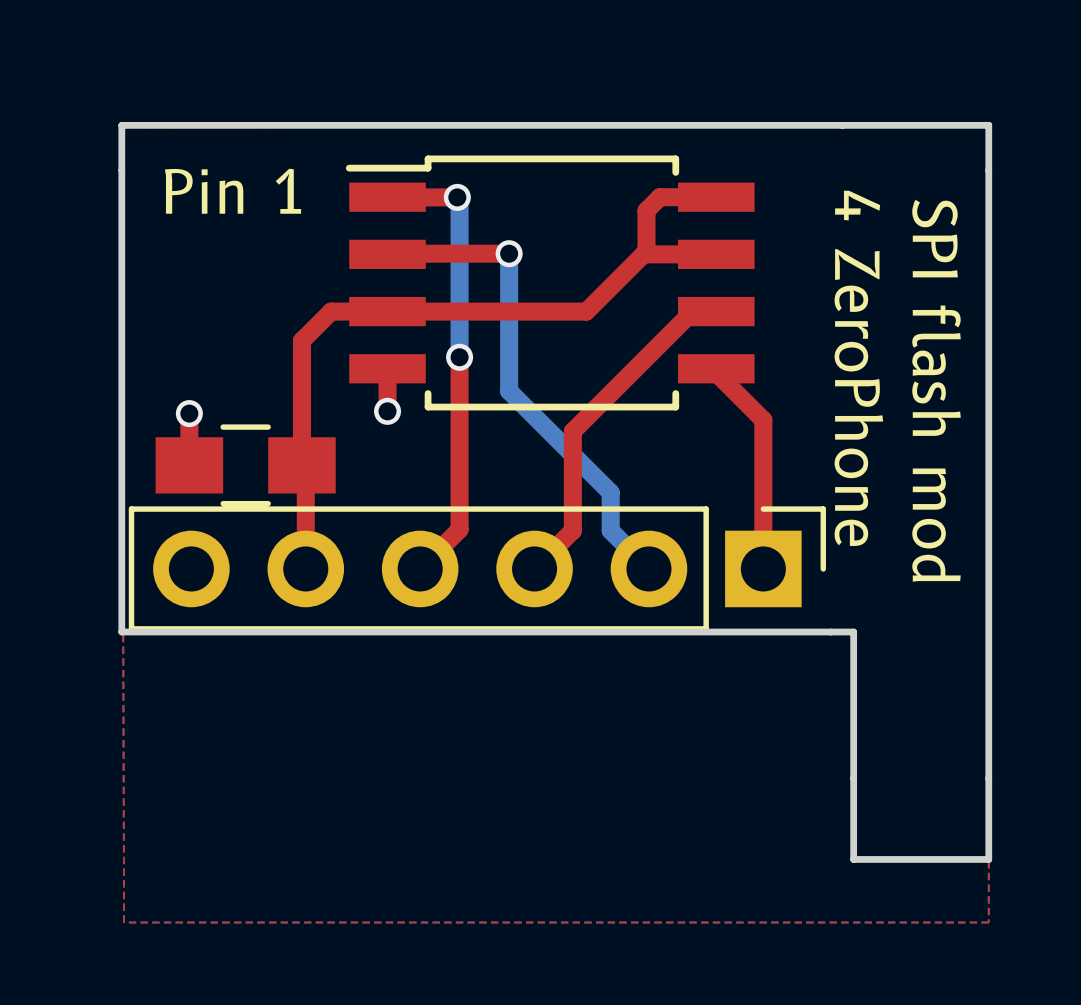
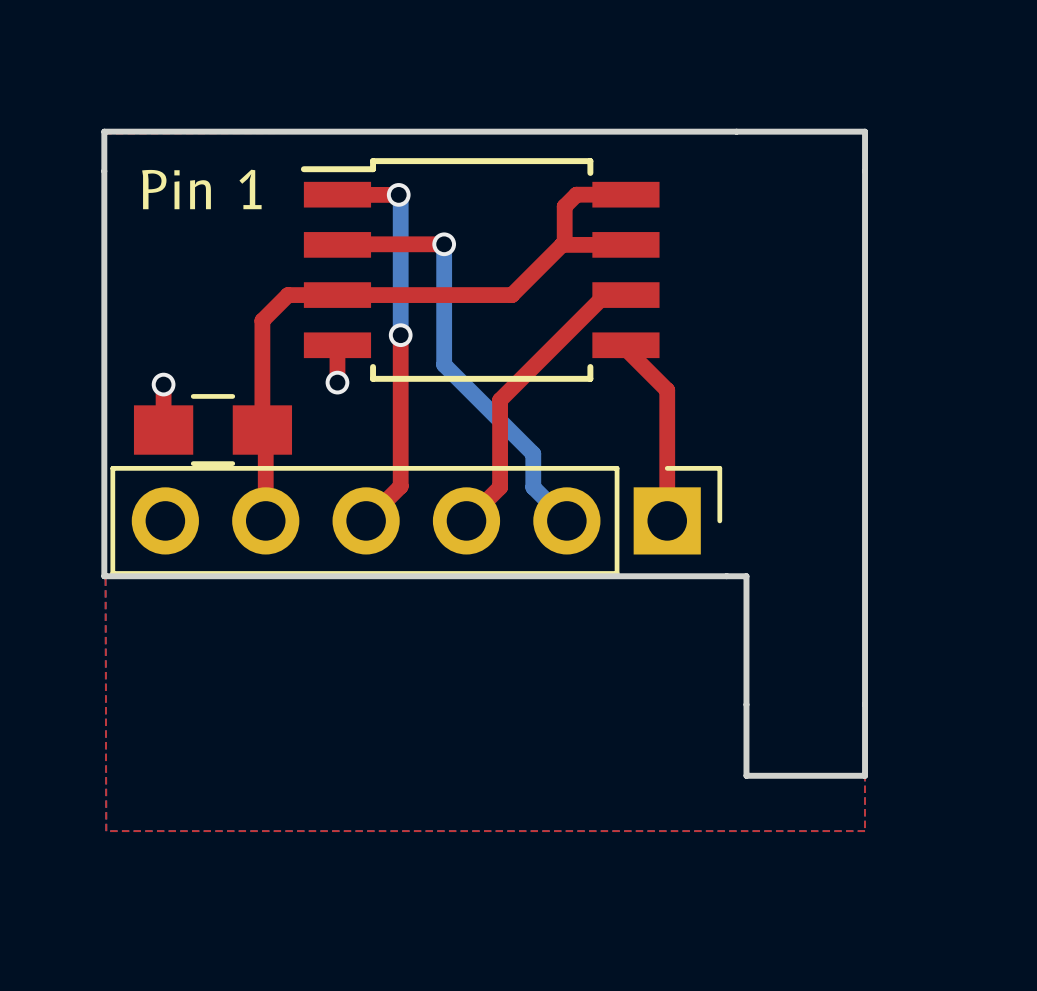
text: 4 ZeroPhone (858, 368) -> none
text: SPI flash mod (936, 390) -> none

